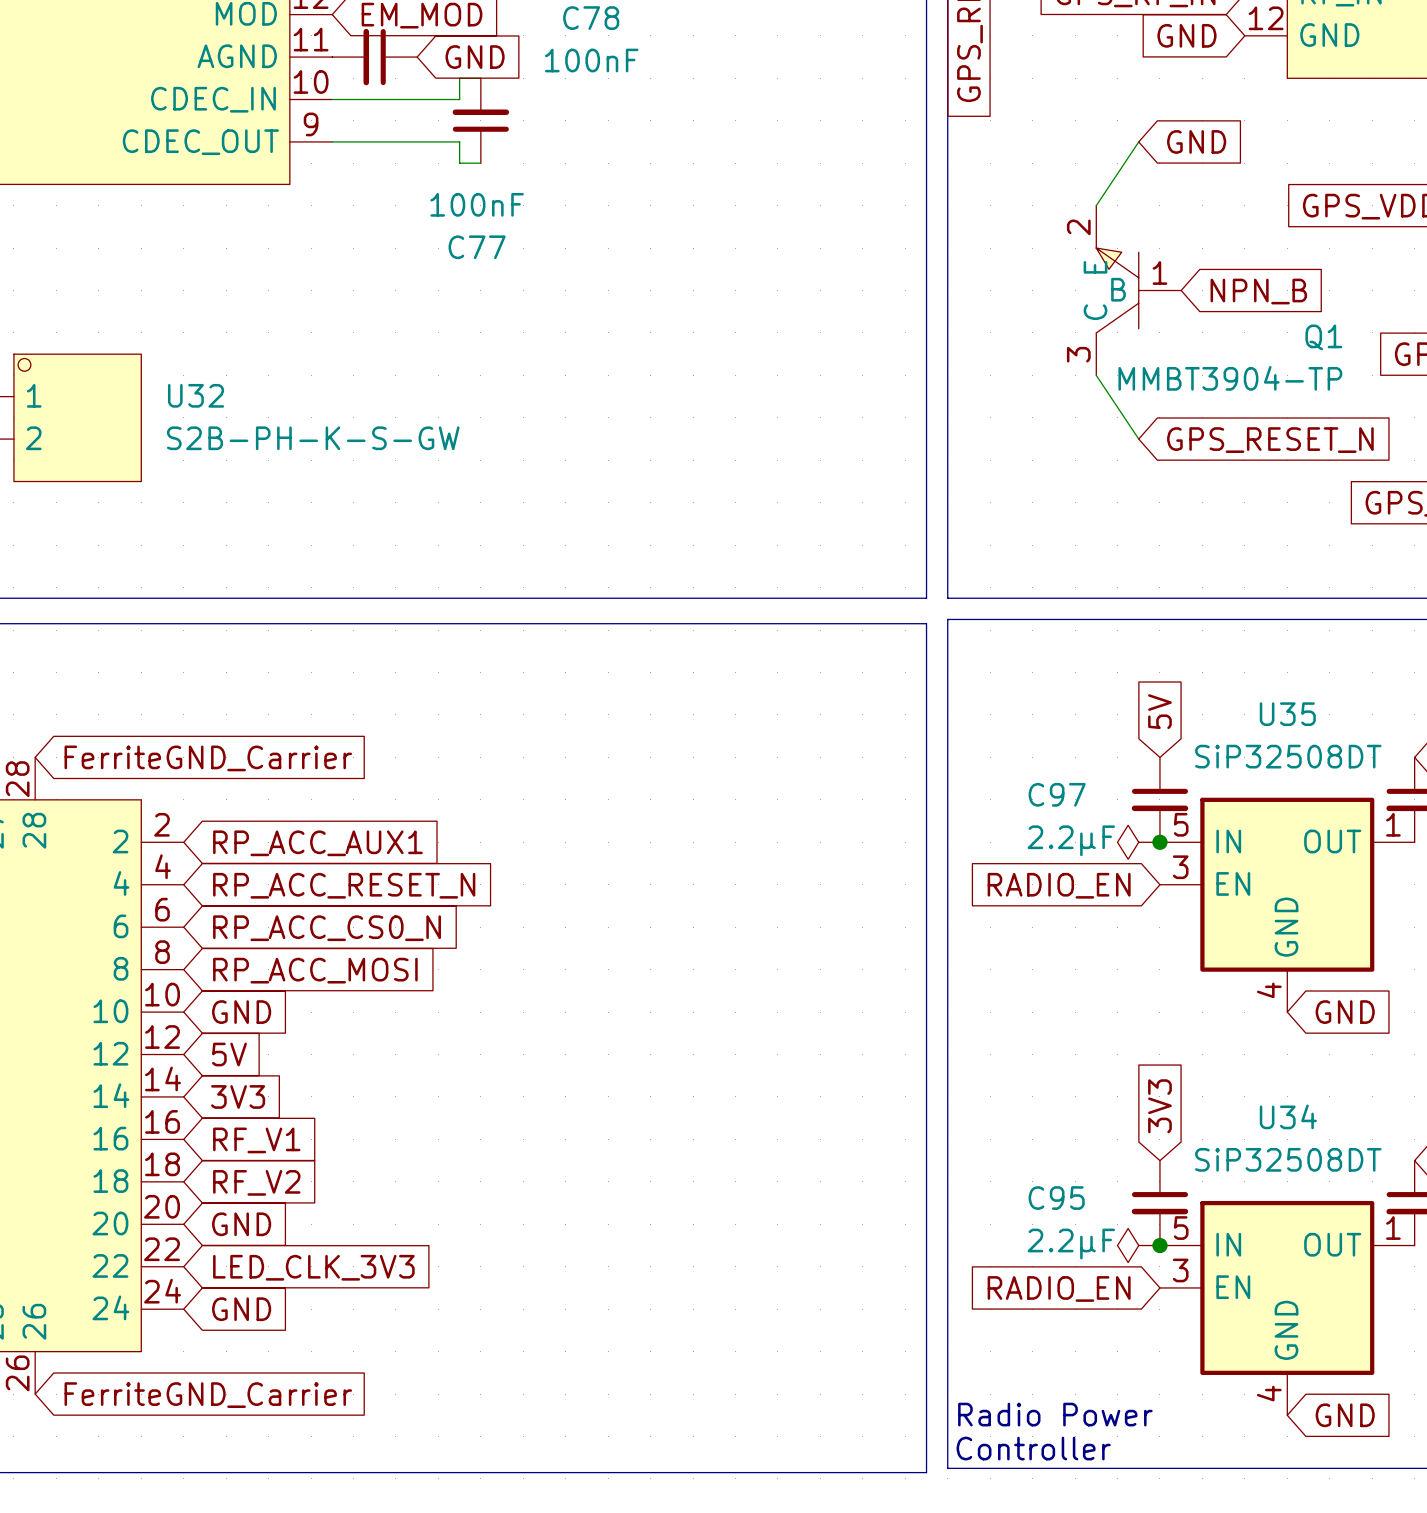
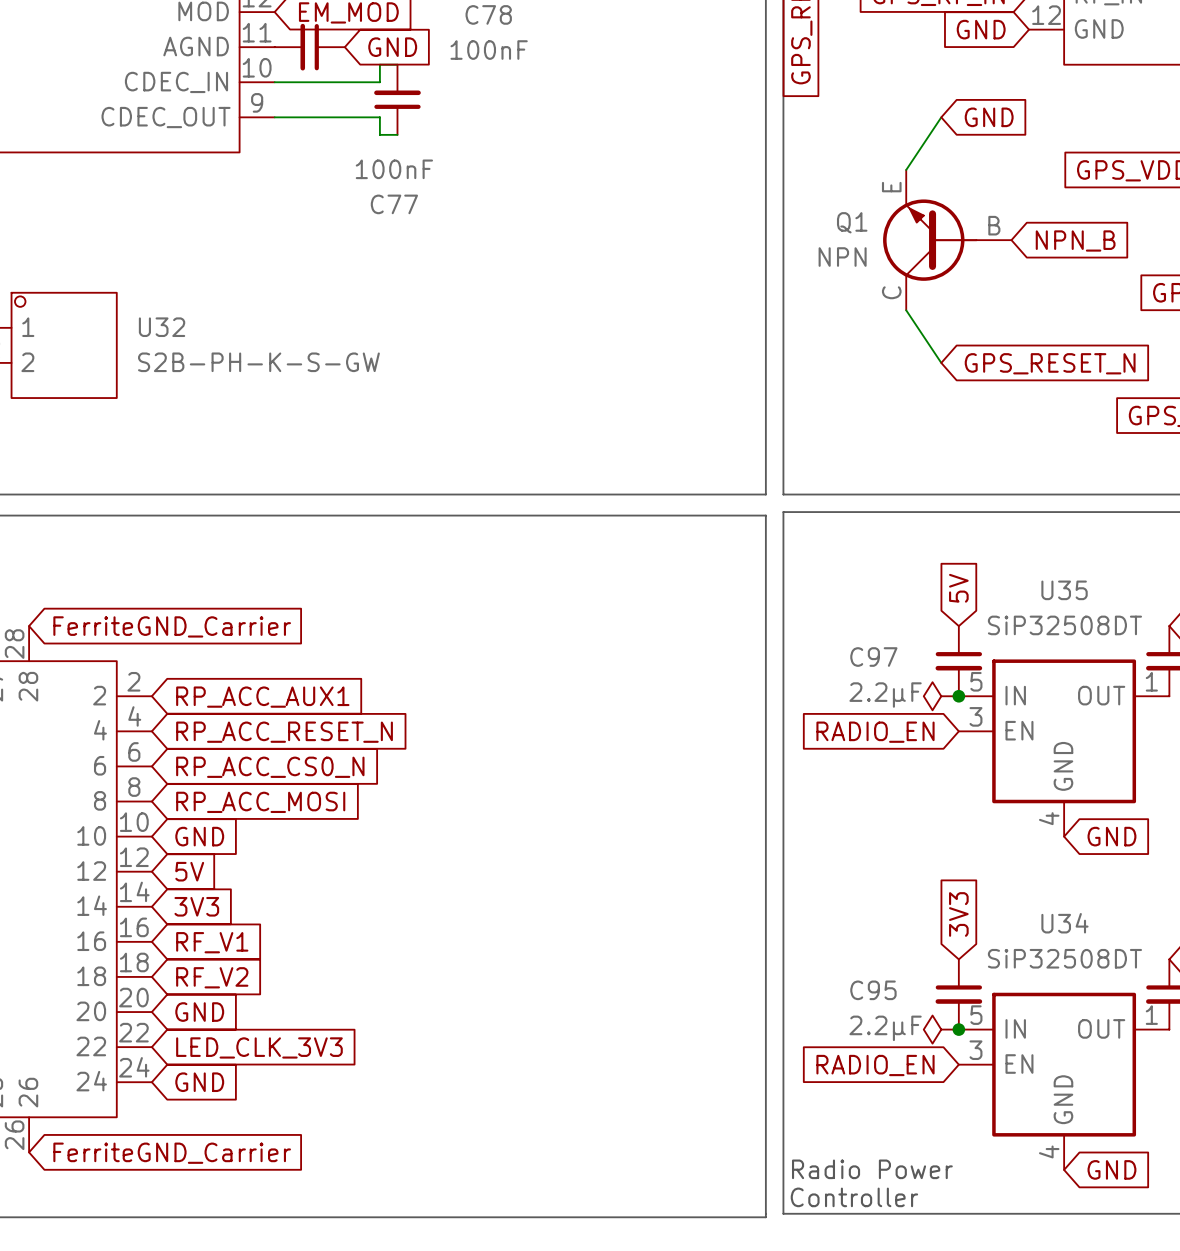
Q1 symbol: [1096, 205, 1182, 376] -> [883, 169, 1012, 311]
global label position: NPN_B (1258, 291) -> NPN_B (1075, 240)
Q1 name position: Q1 (1323, 337) -> Q1 (852, 222)
Q1 value: MMBT3904-TP (1230, 378) -> NPN (842, 257)

